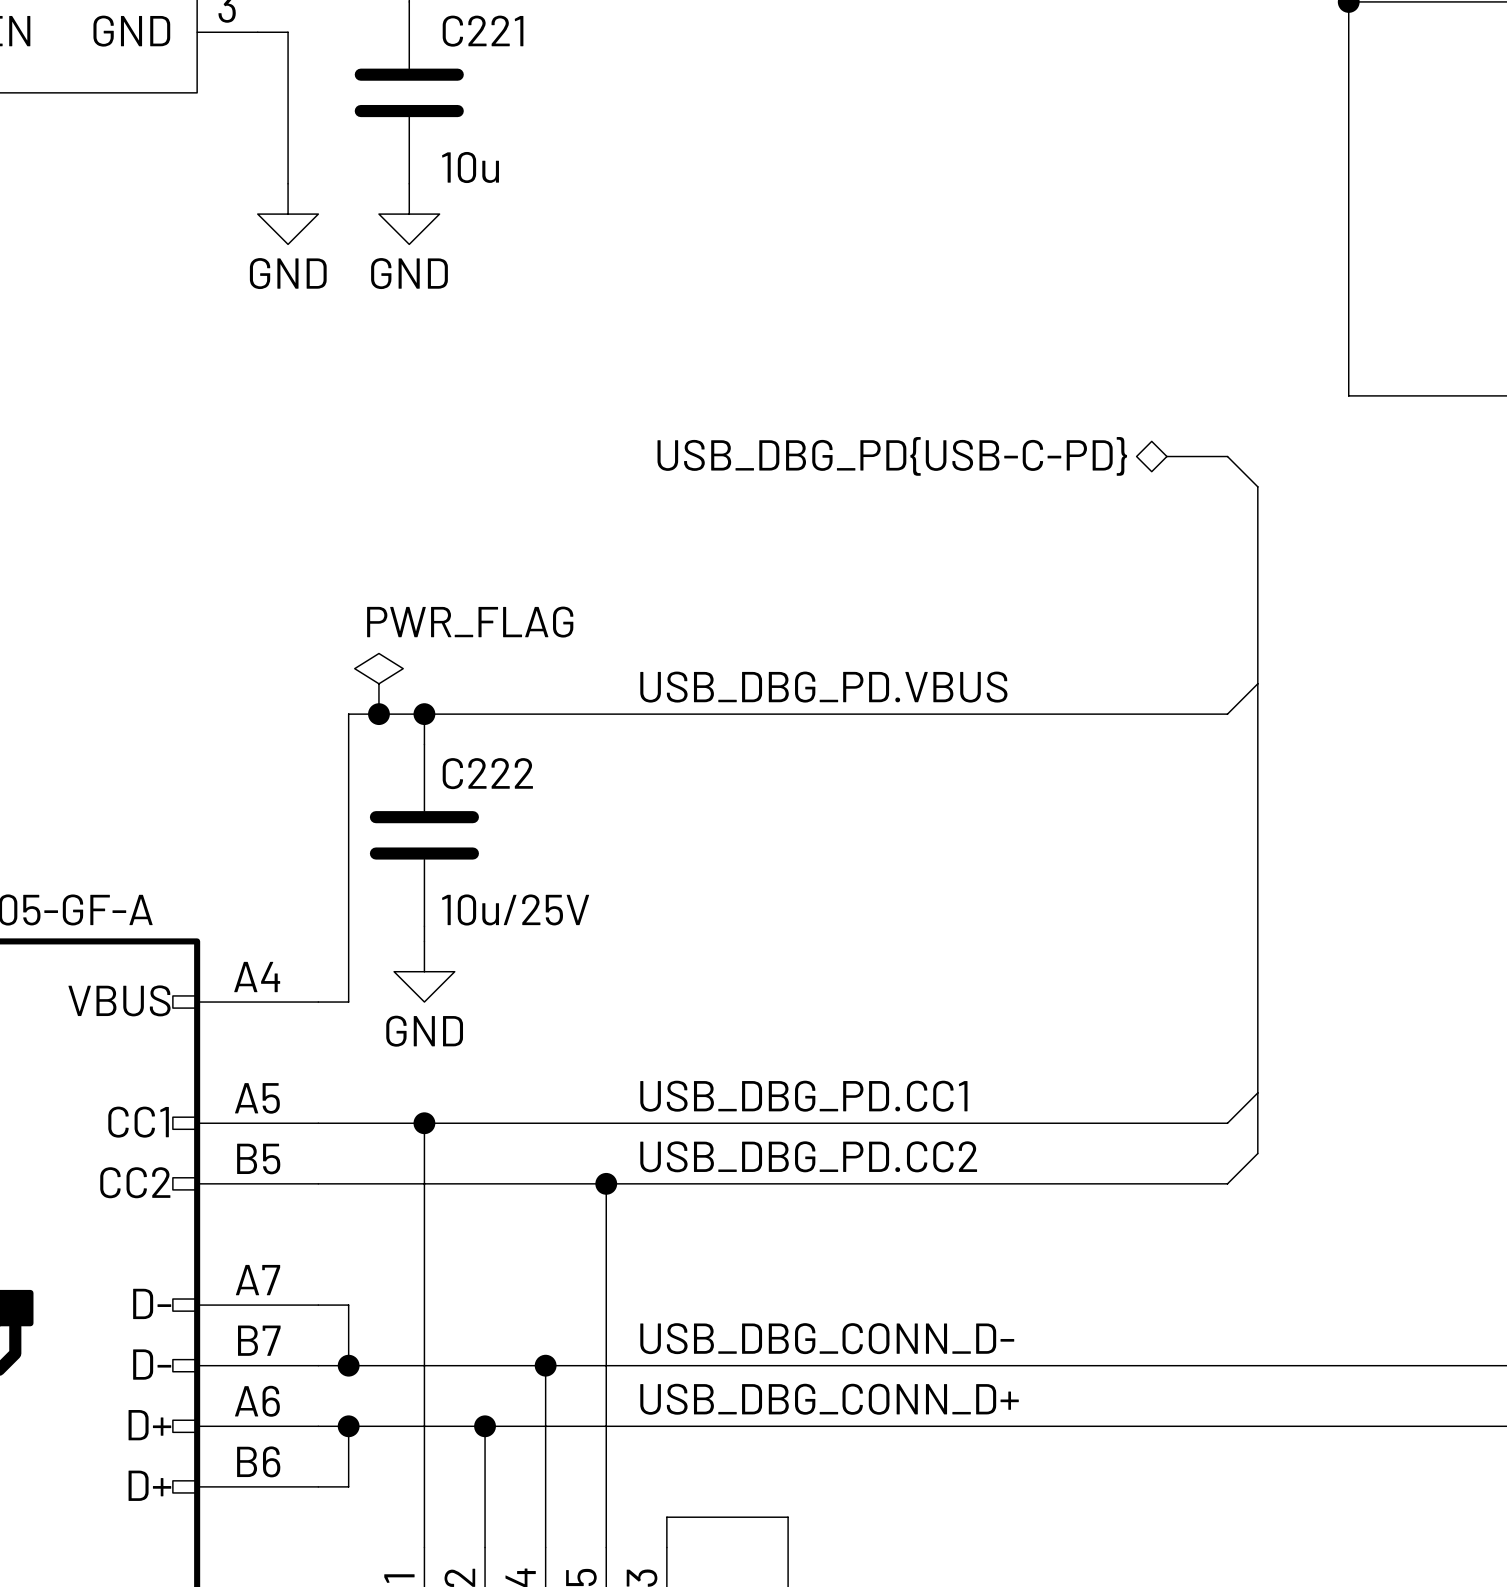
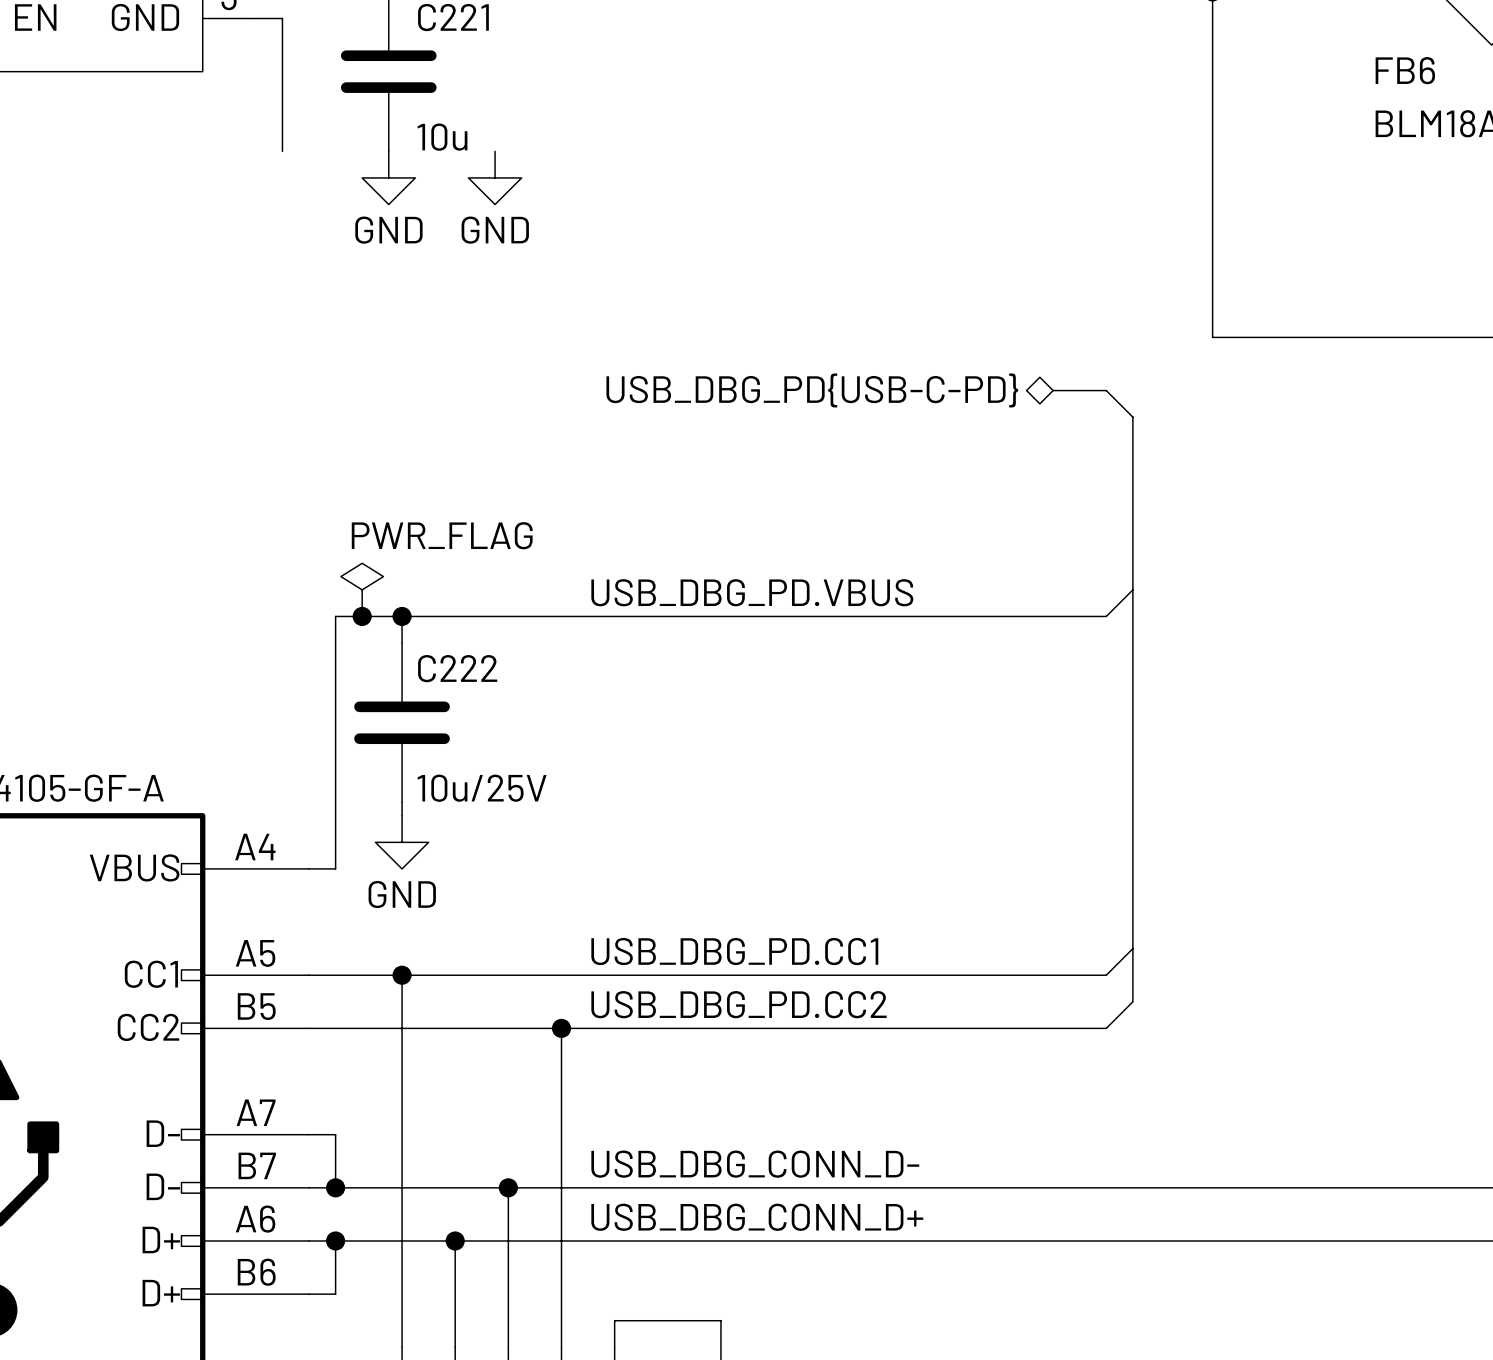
power symbol position: GND (288, 214) -> GND (495, 177)

